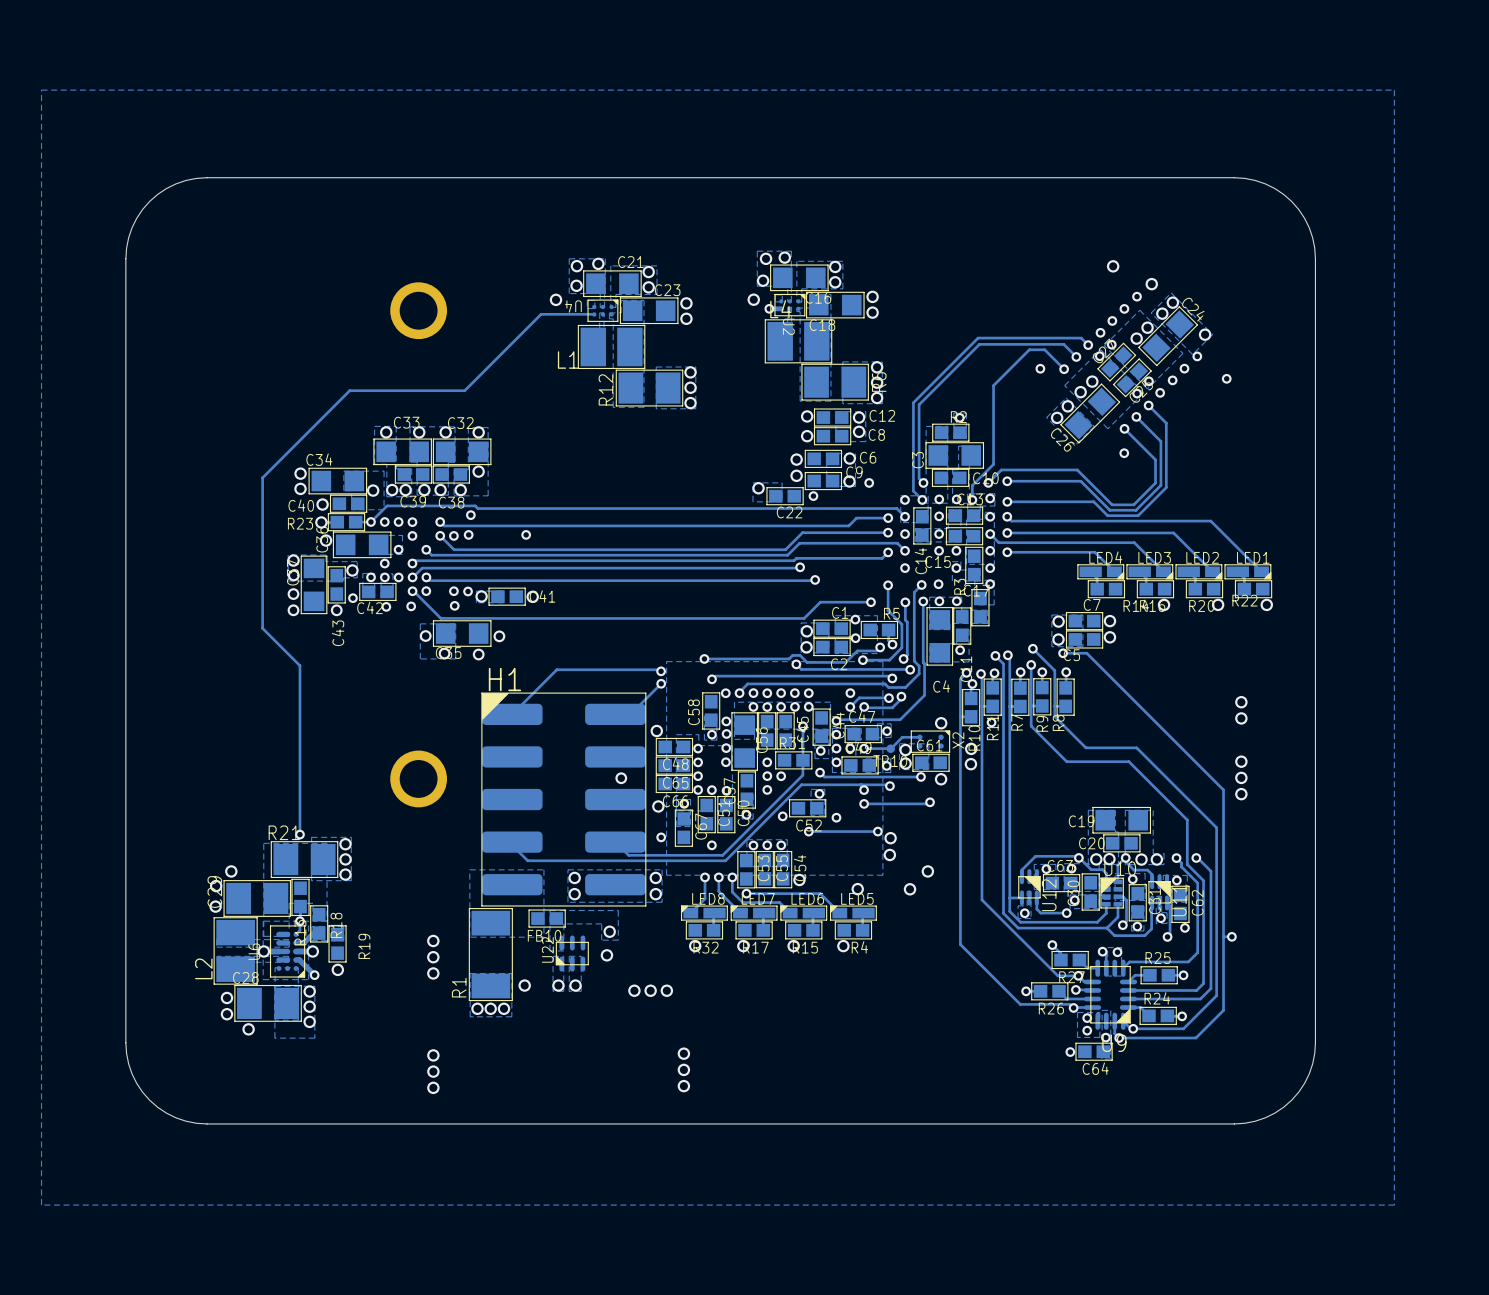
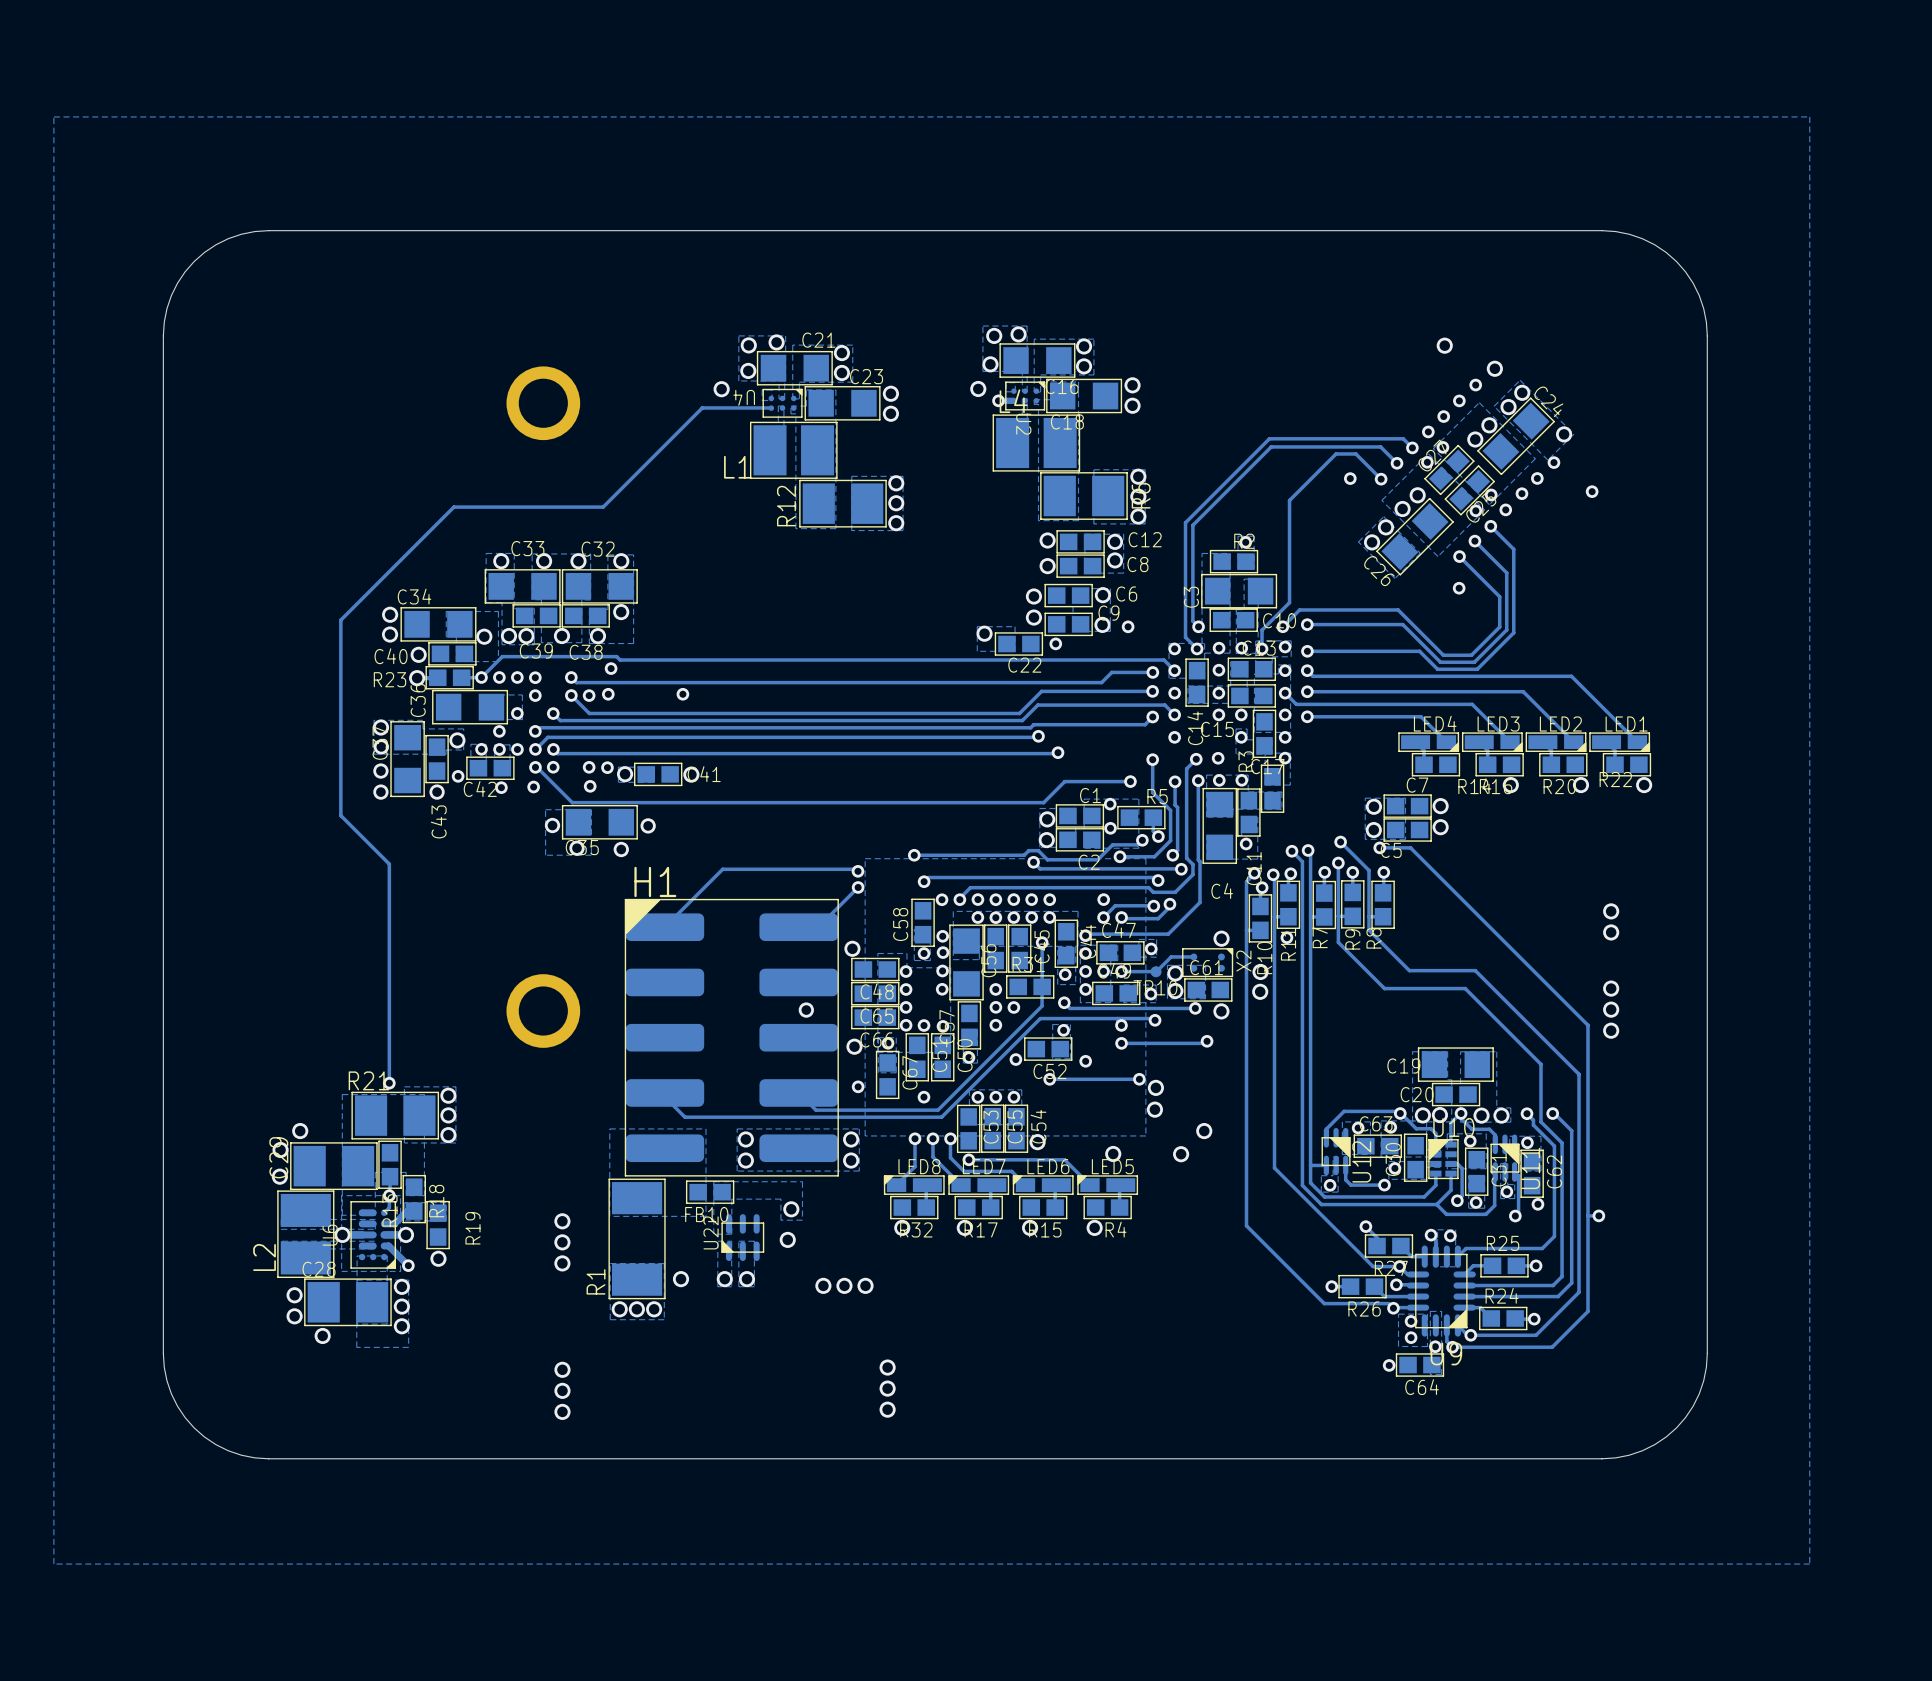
via: (424, 490) -> none
via: none -> (561, 636)
via: (440, 490) -> none
via: (326, 540) -> none

